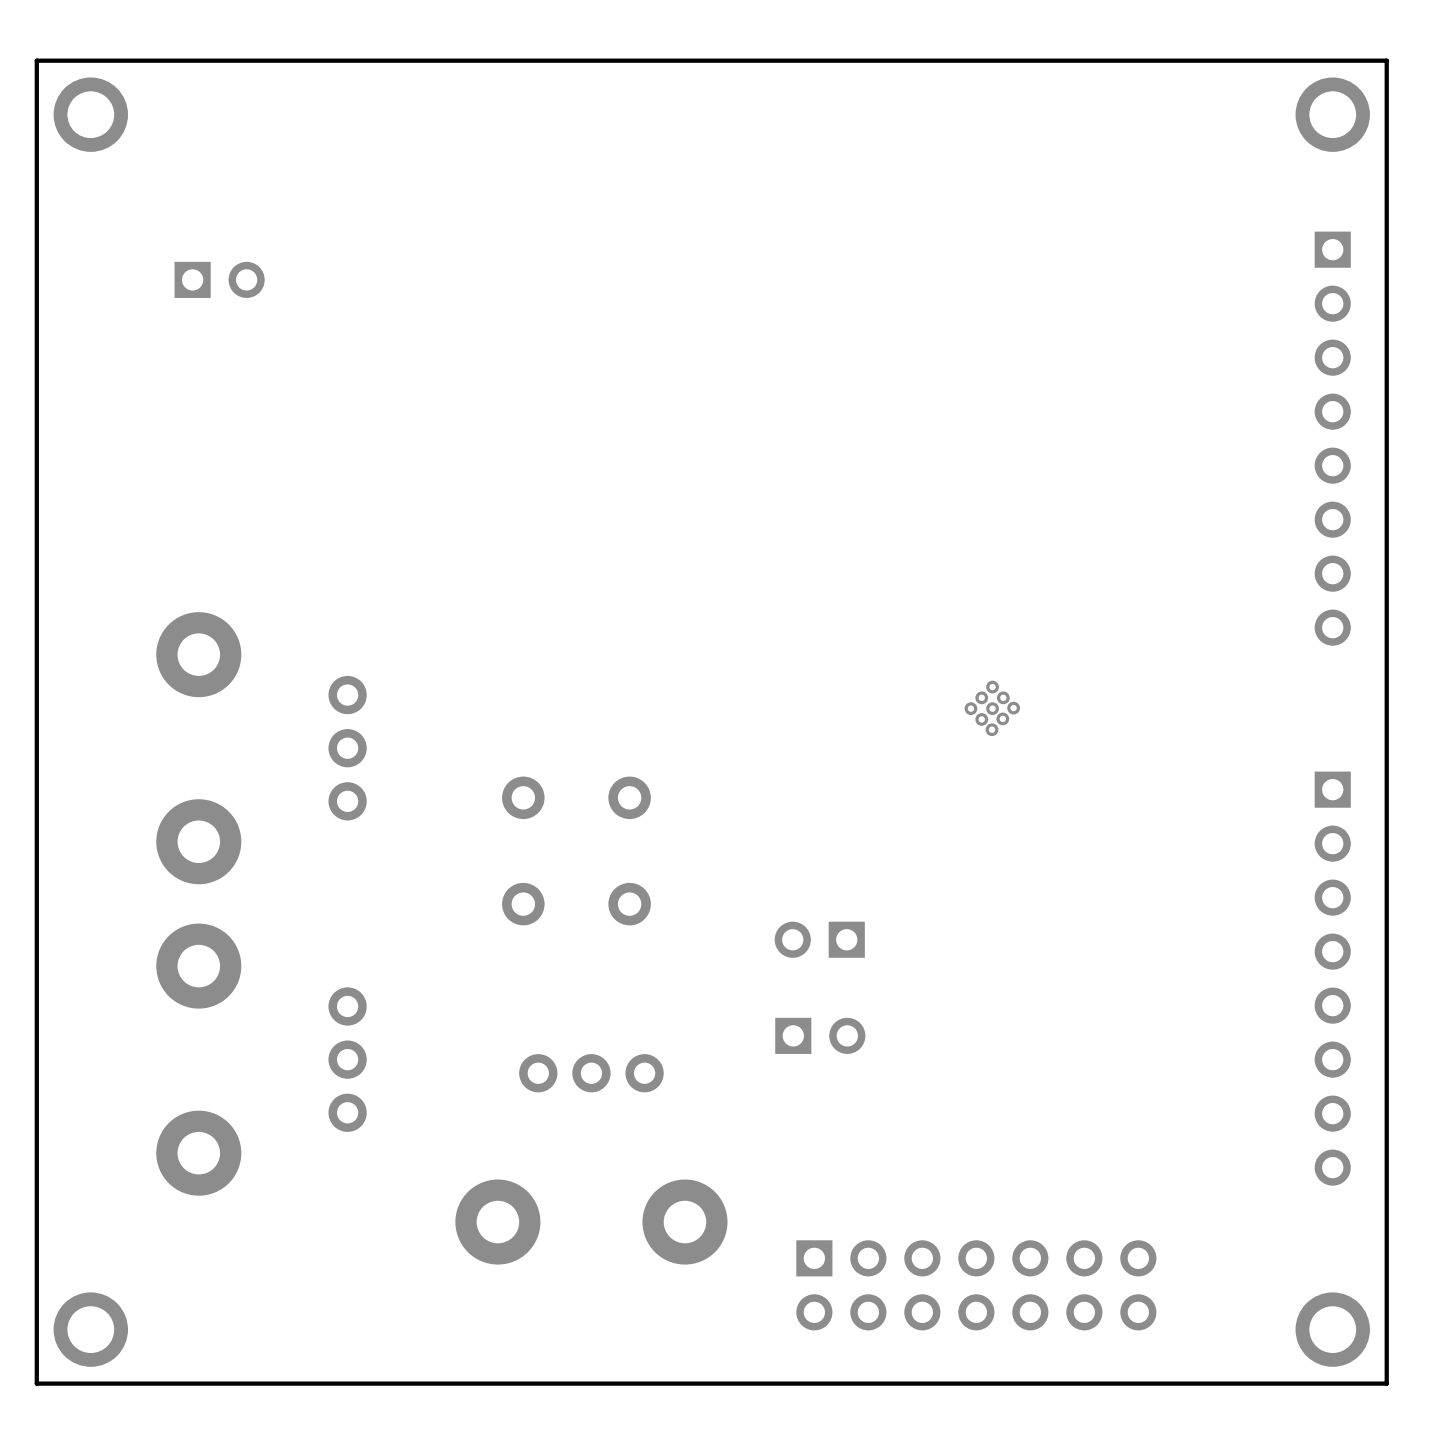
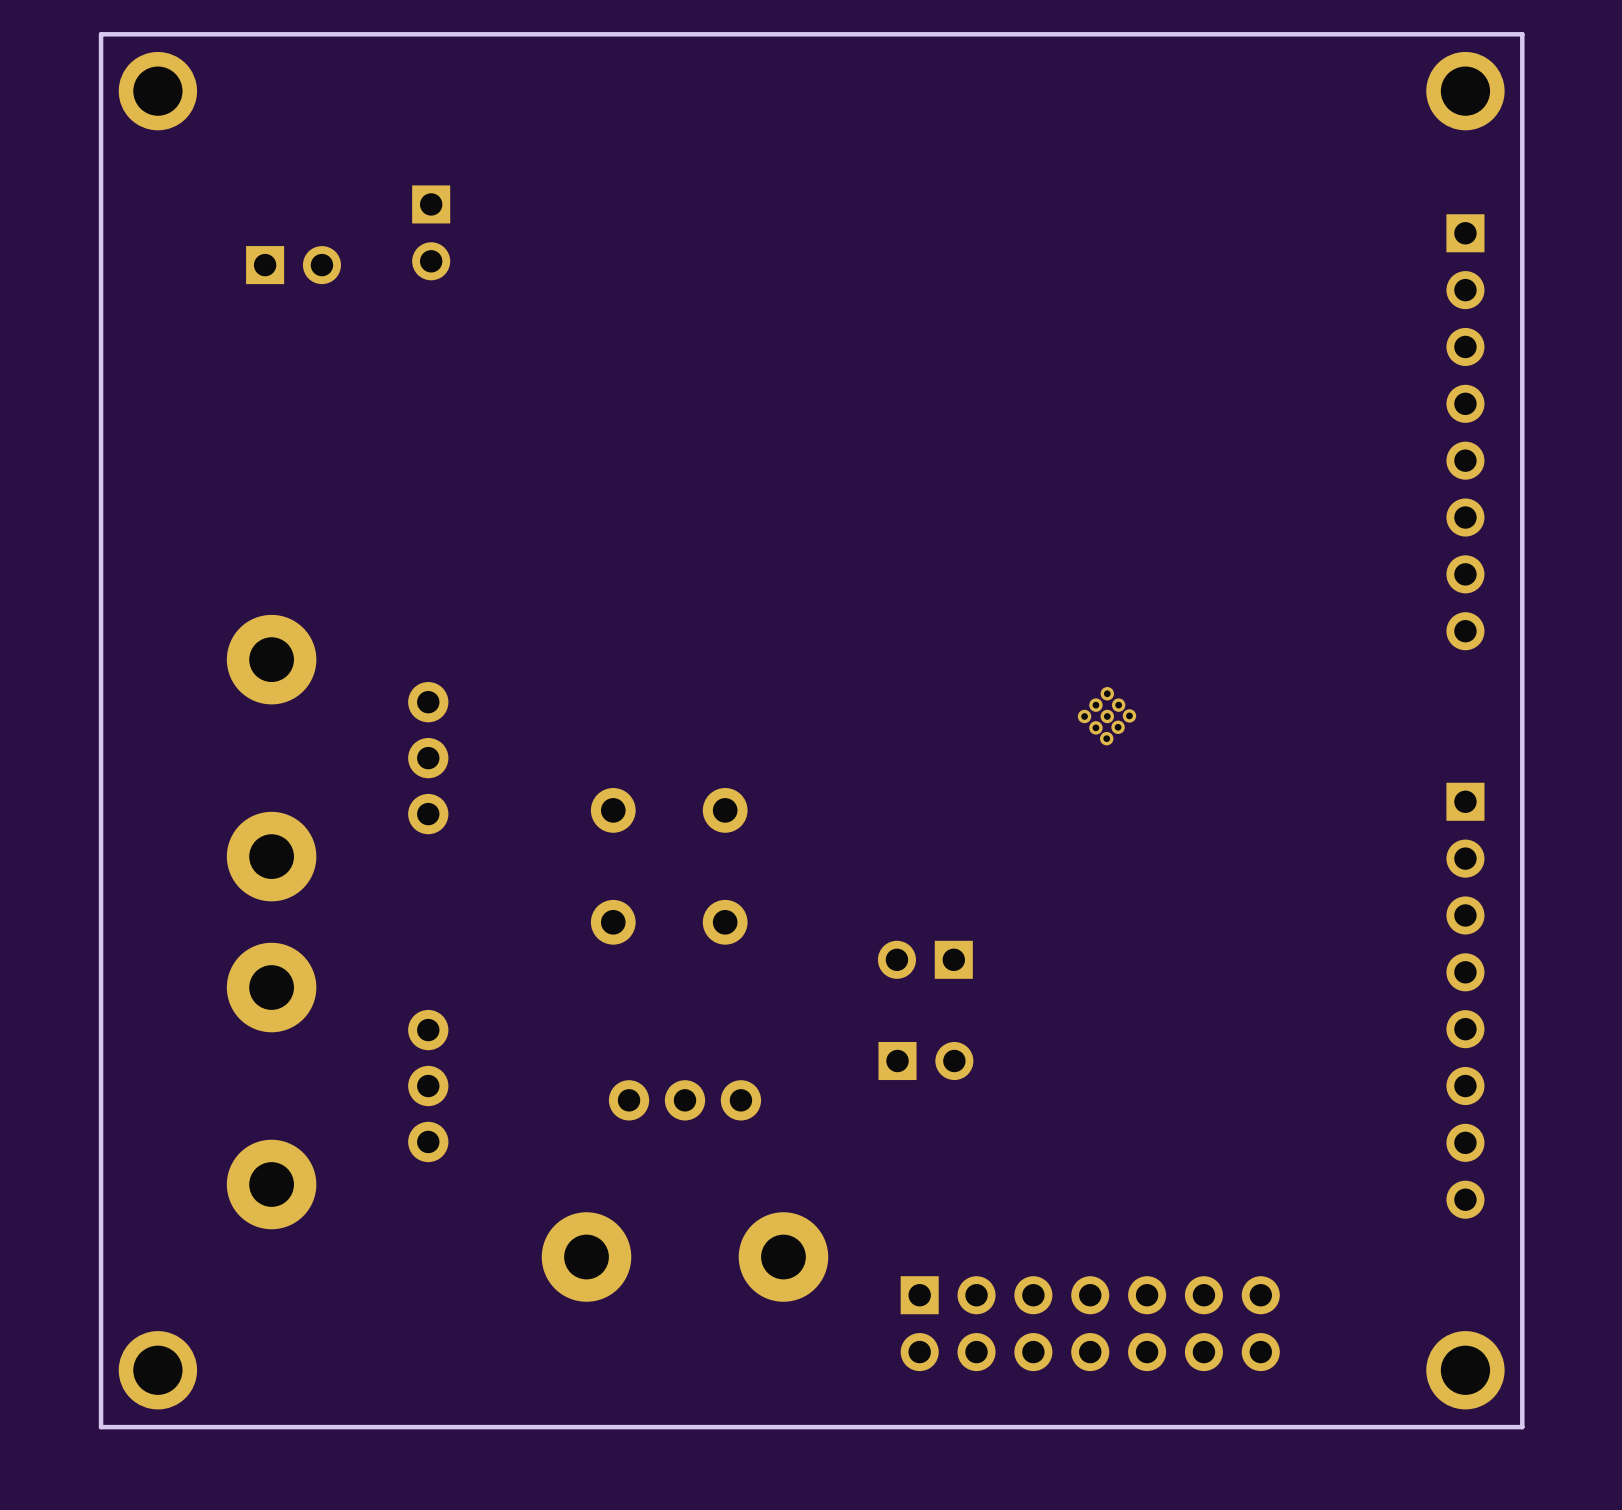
part: none -> (431, 232)

